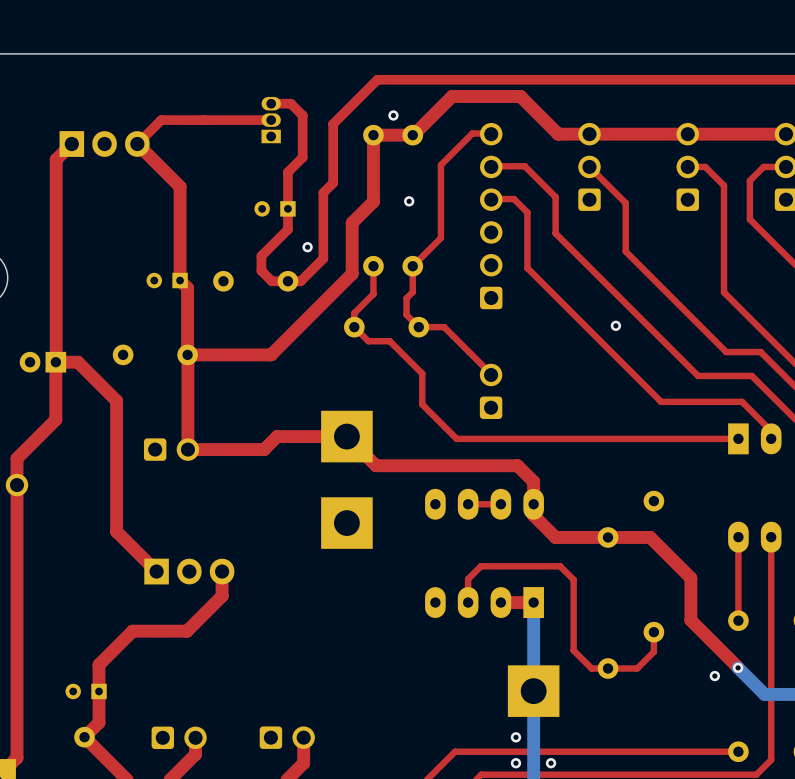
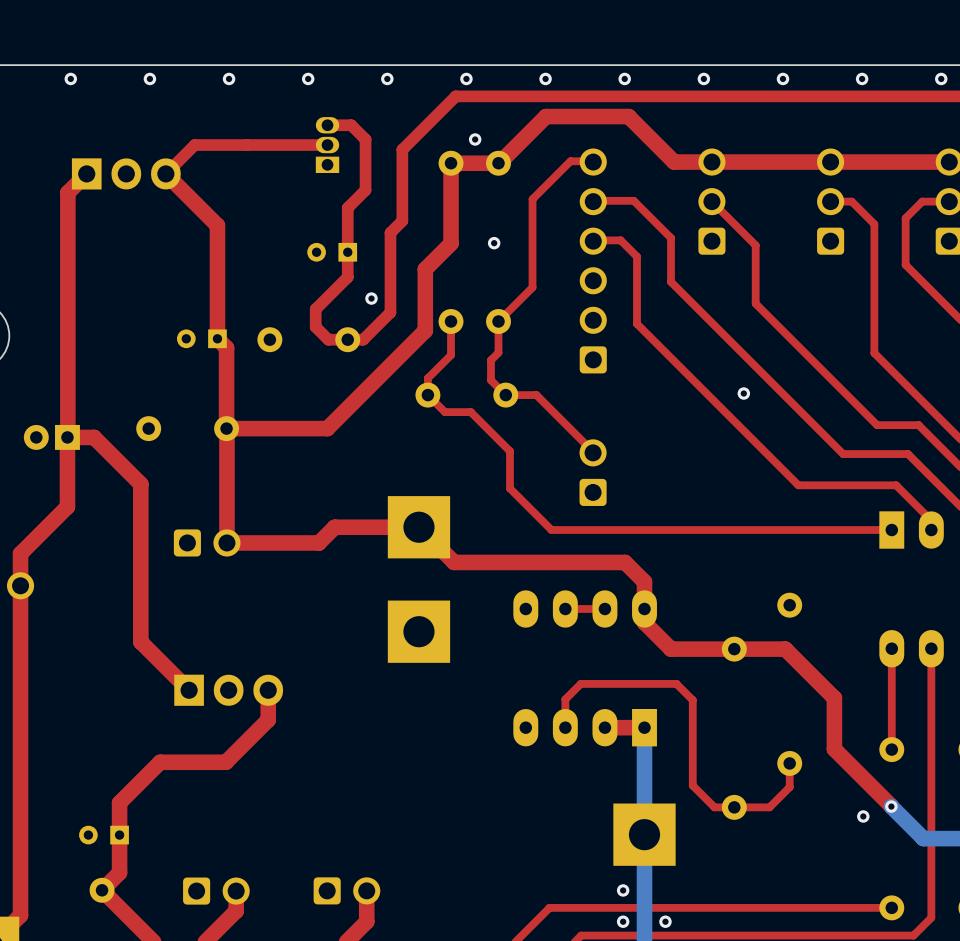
via: none -> (70, 78)
via: none -> (149, 78)
via: none -> (229, 78)
via: none -> (308, 78)
via: none -> (387, 78)
via: none -> (466, 78)
via: none -> (545, 78)
via: none -> (624, 78)
via: none -> (703, 78)
via: none -> (782, 78)
via: none -> (862, 78)
via: none -> (941, 78)

